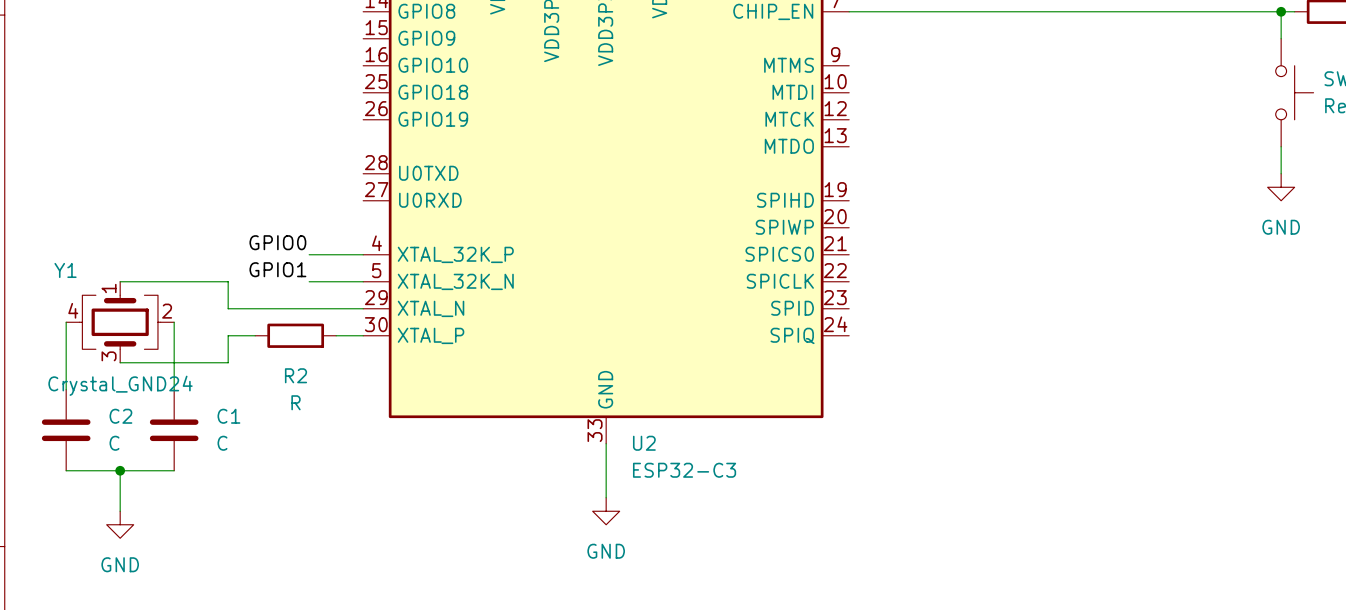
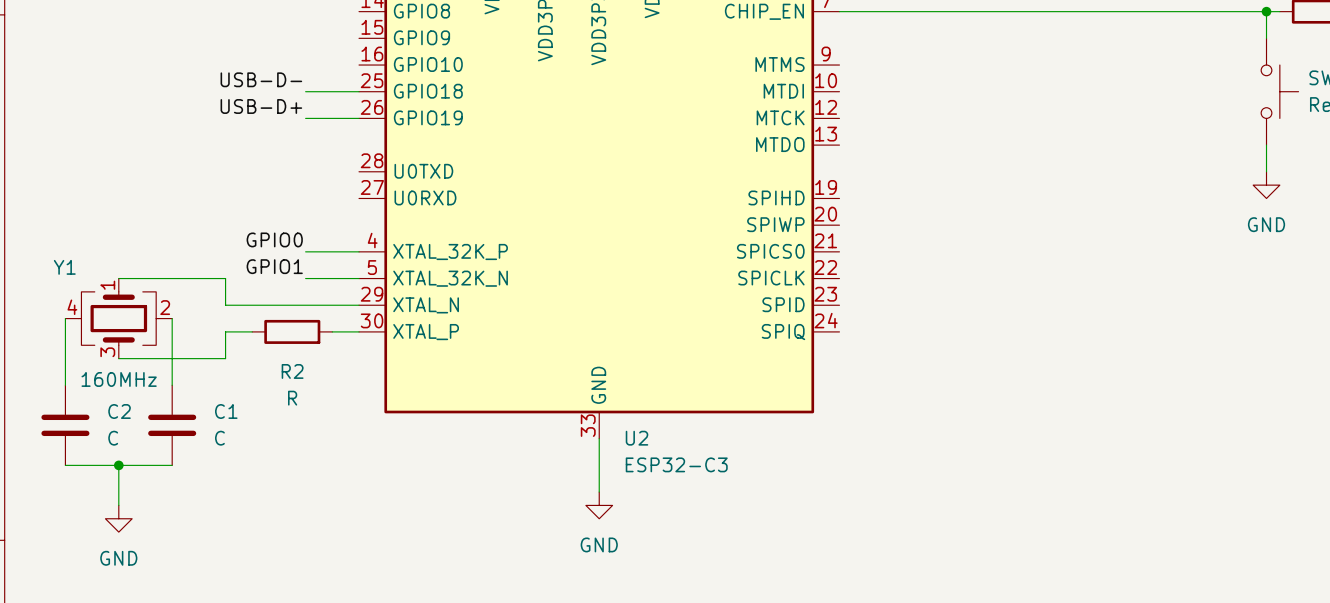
label: none -> USB-D- (261, 79)
wire: none -> (305, 91) (359, 91)
label: none -> USB-D+ (261, 106)
wire: none -> (305, 118) (359, 118)
Y1 value: Crystal_GND24 (120, 385) -> 160MHz (119, 379)

